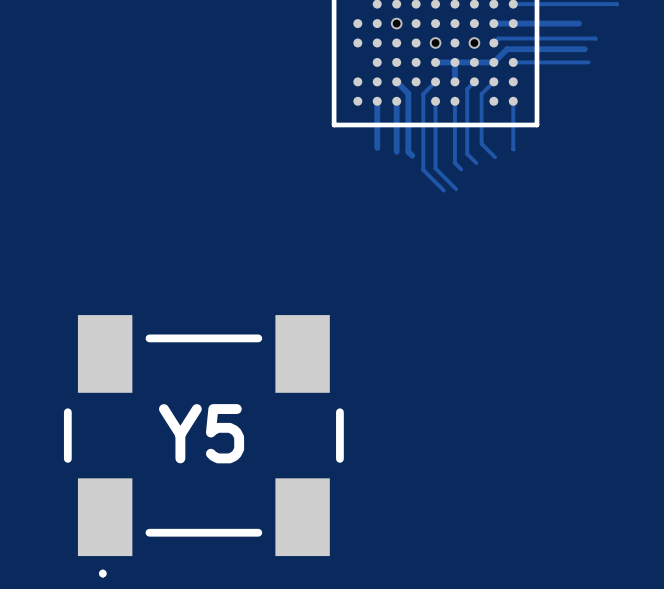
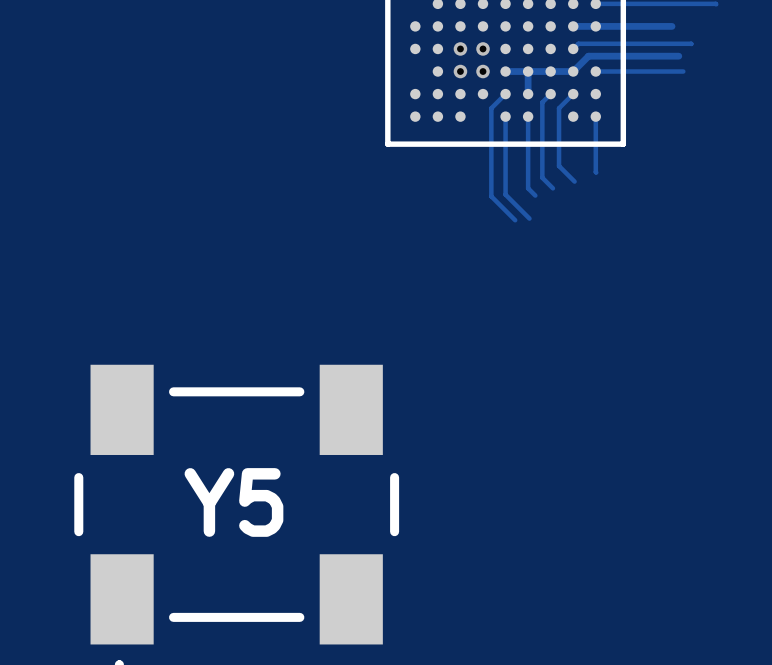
via: (396, 23) -> none
via: none -> (460, 48)
via: none -> (483, 48)
via: (435, 42) -> none
via: (474, 42) -> none
via: none -> (460, 71)
via: none -> (483, 71)
track: (396, 81) (408, 93) (408, 151) (412, 155) -> none
track: (377, 101) (377, 147) -> none
track: (396, 101) (396, 151) -> none

